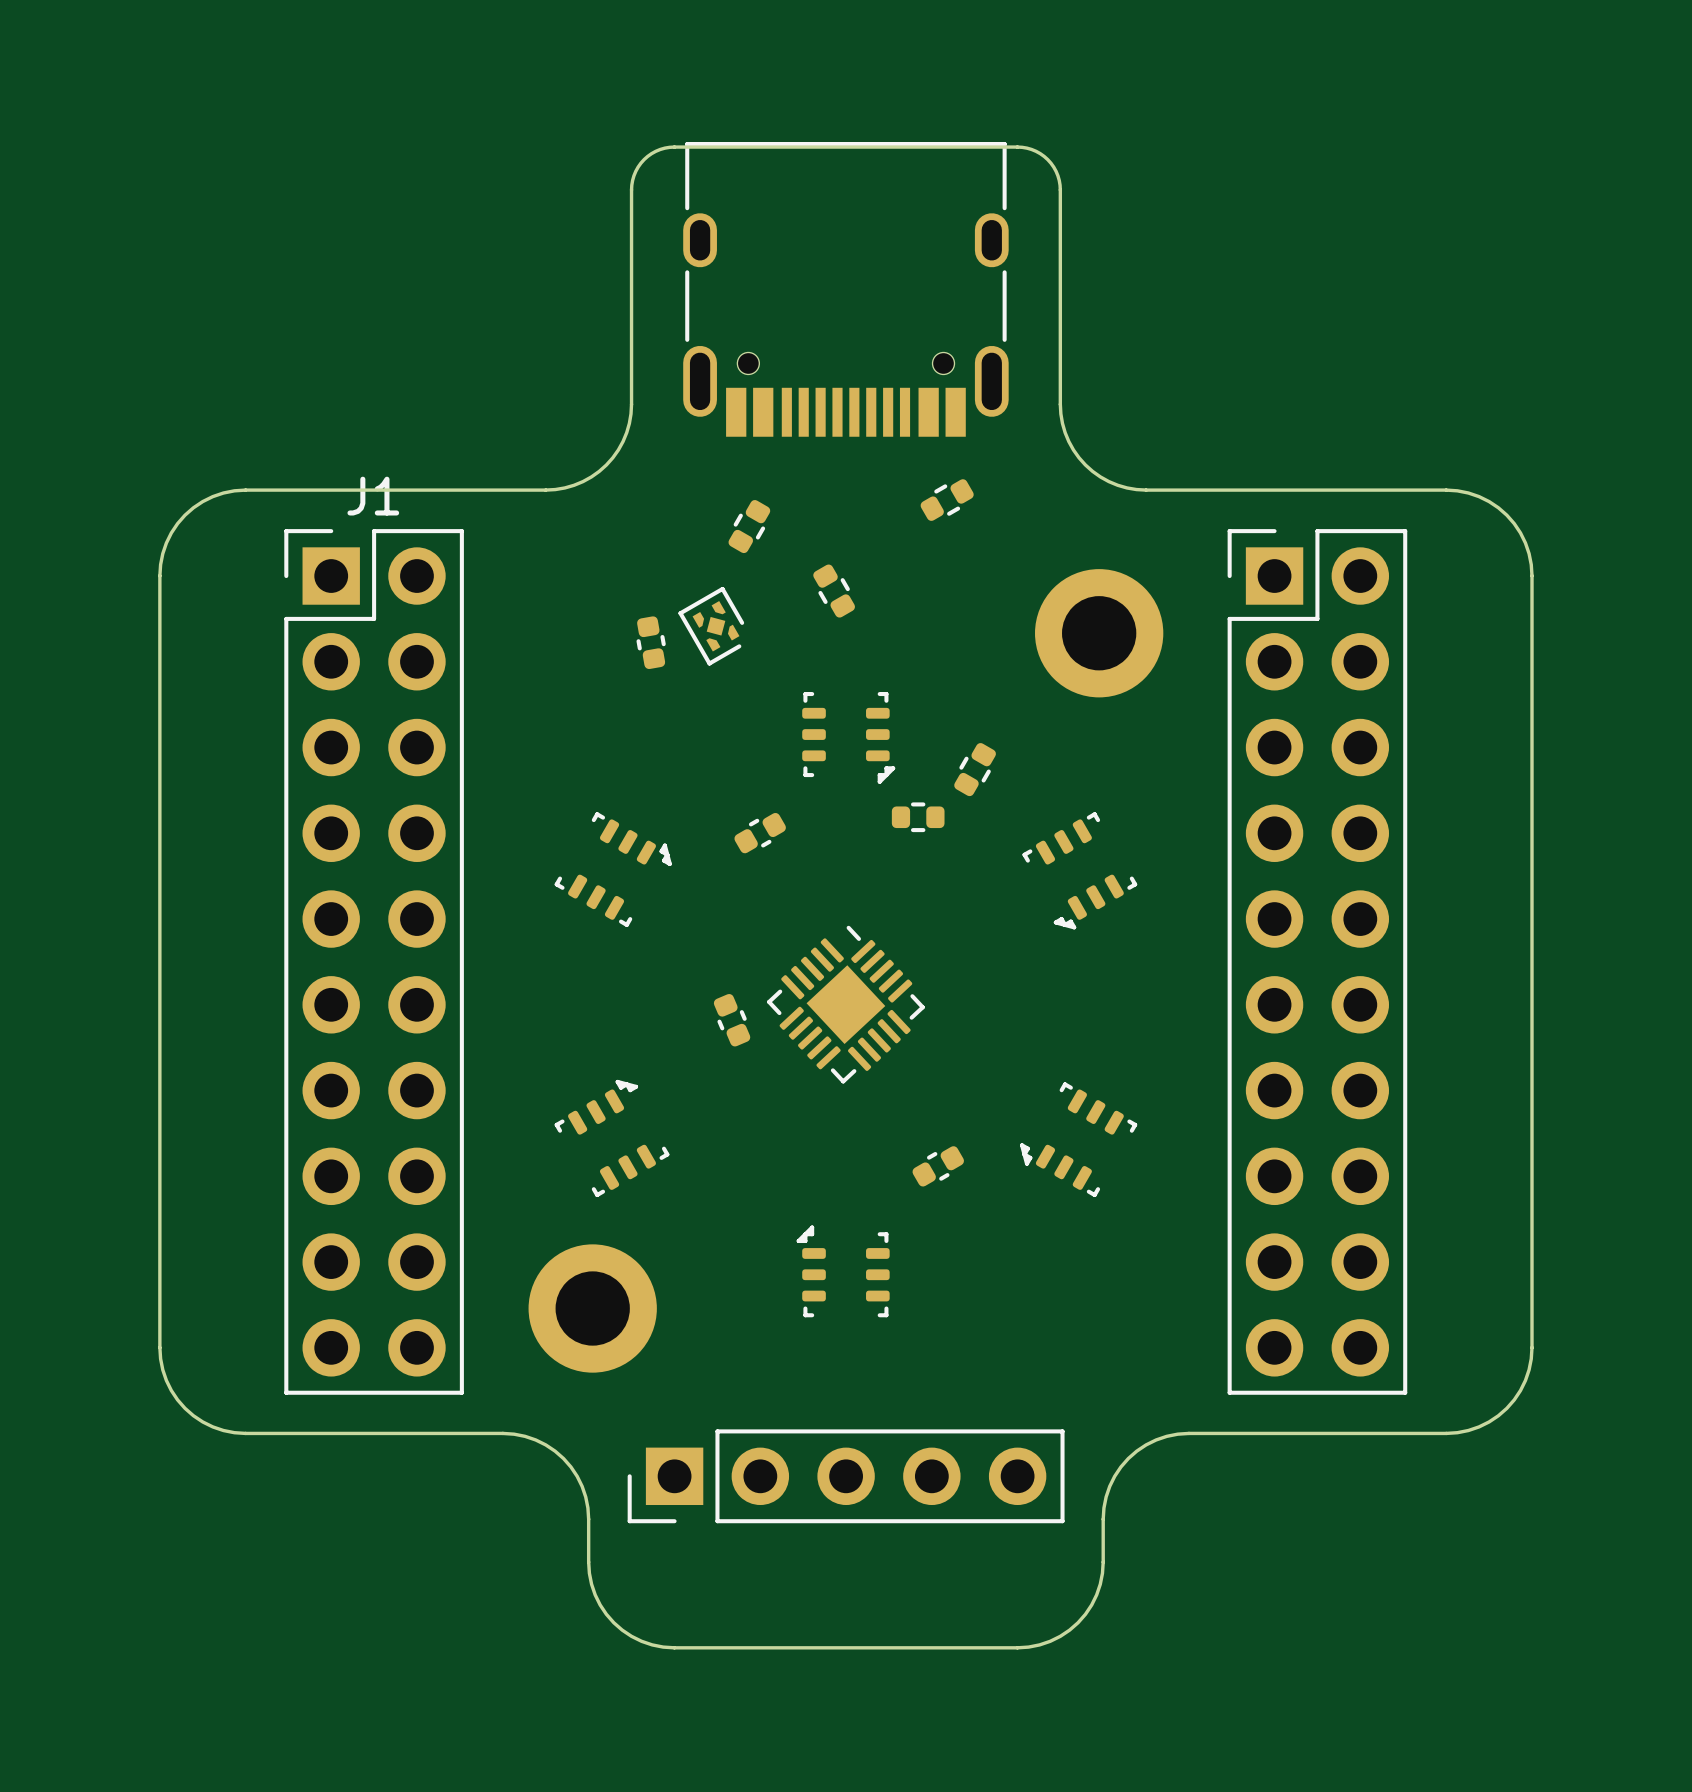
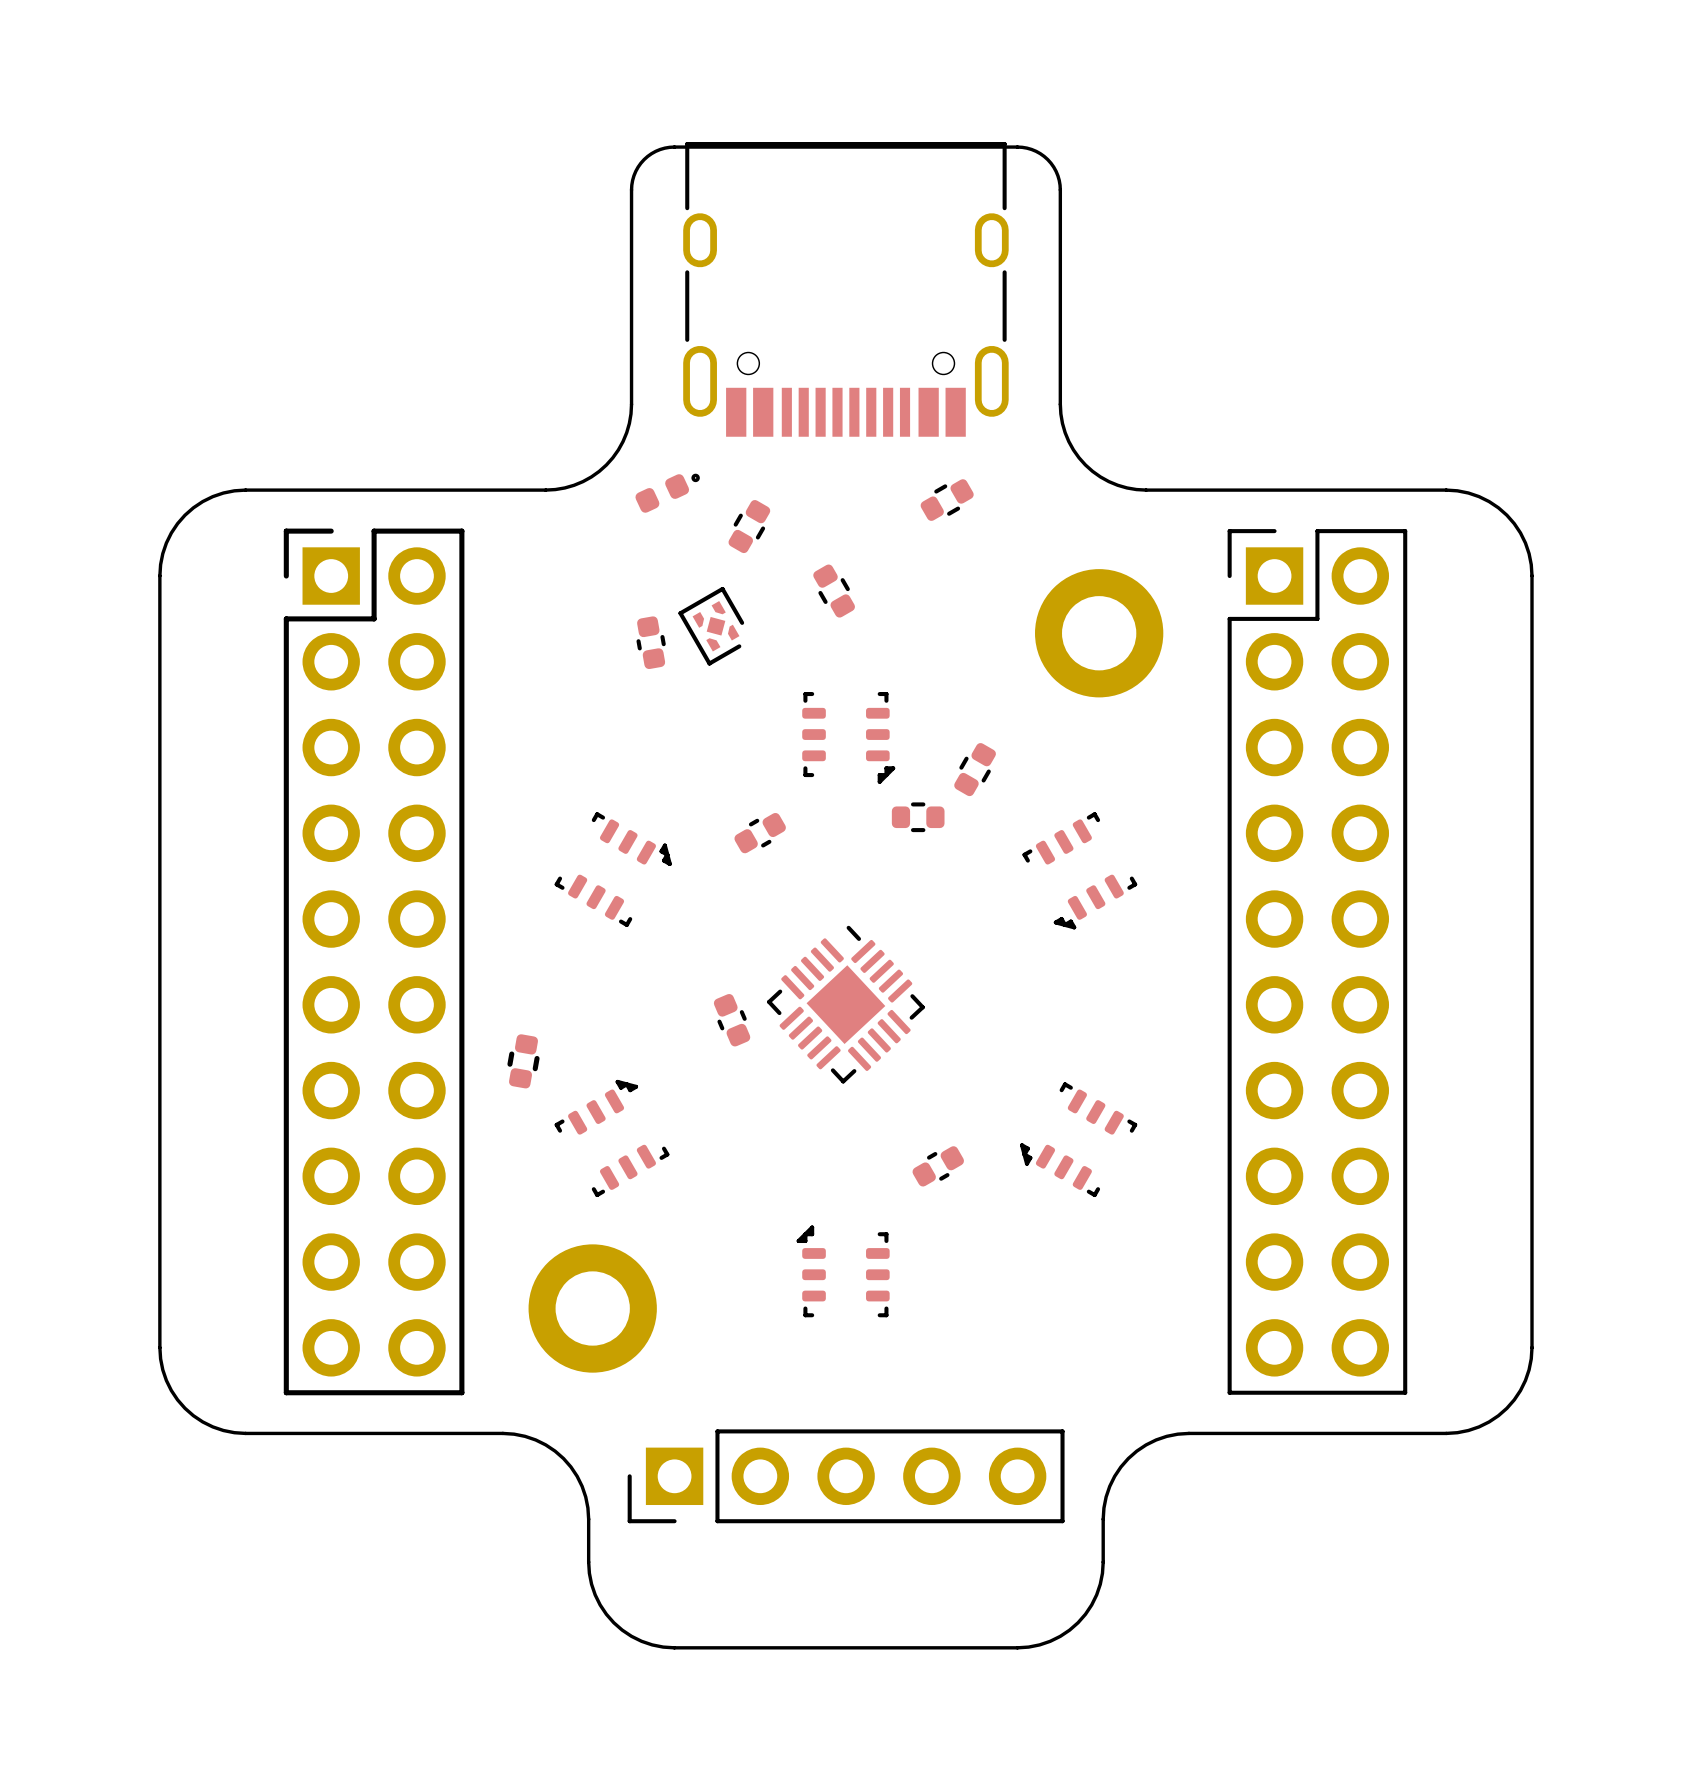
part: none -> (667, 493)
J1: (374, 961) -> none
part: none -> (374, 961)
part: none -> (523, 1061)

